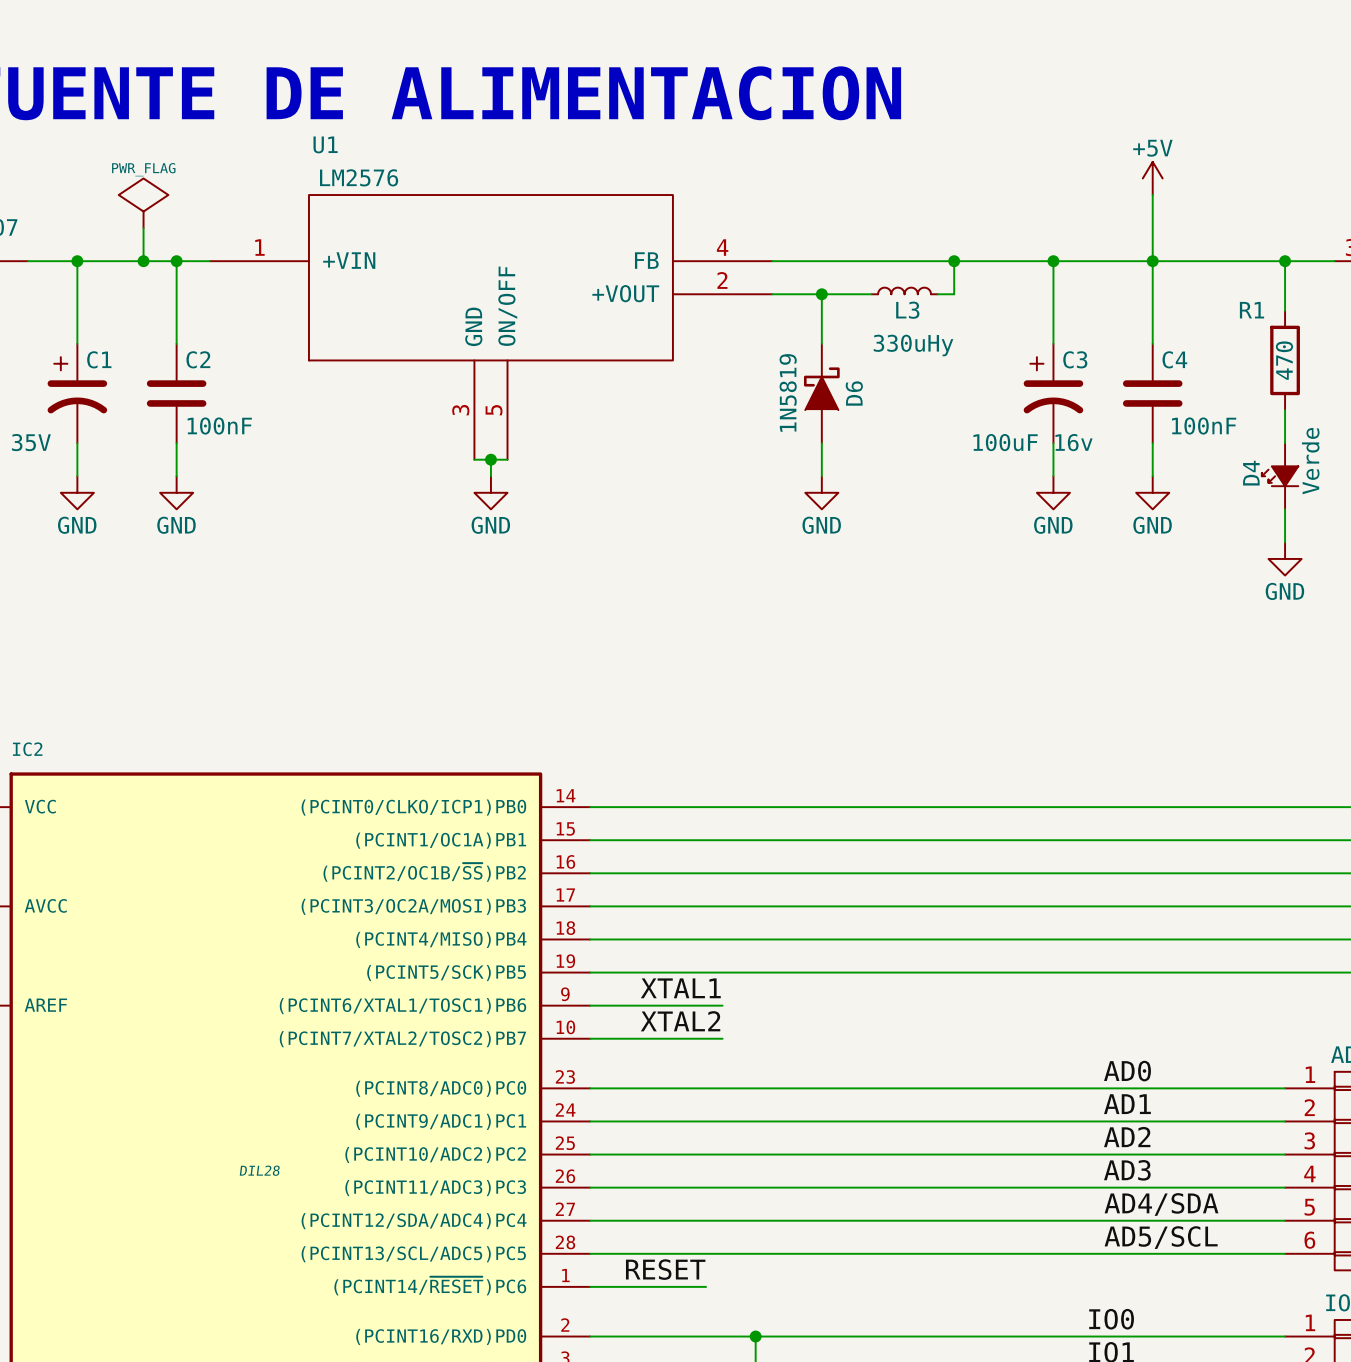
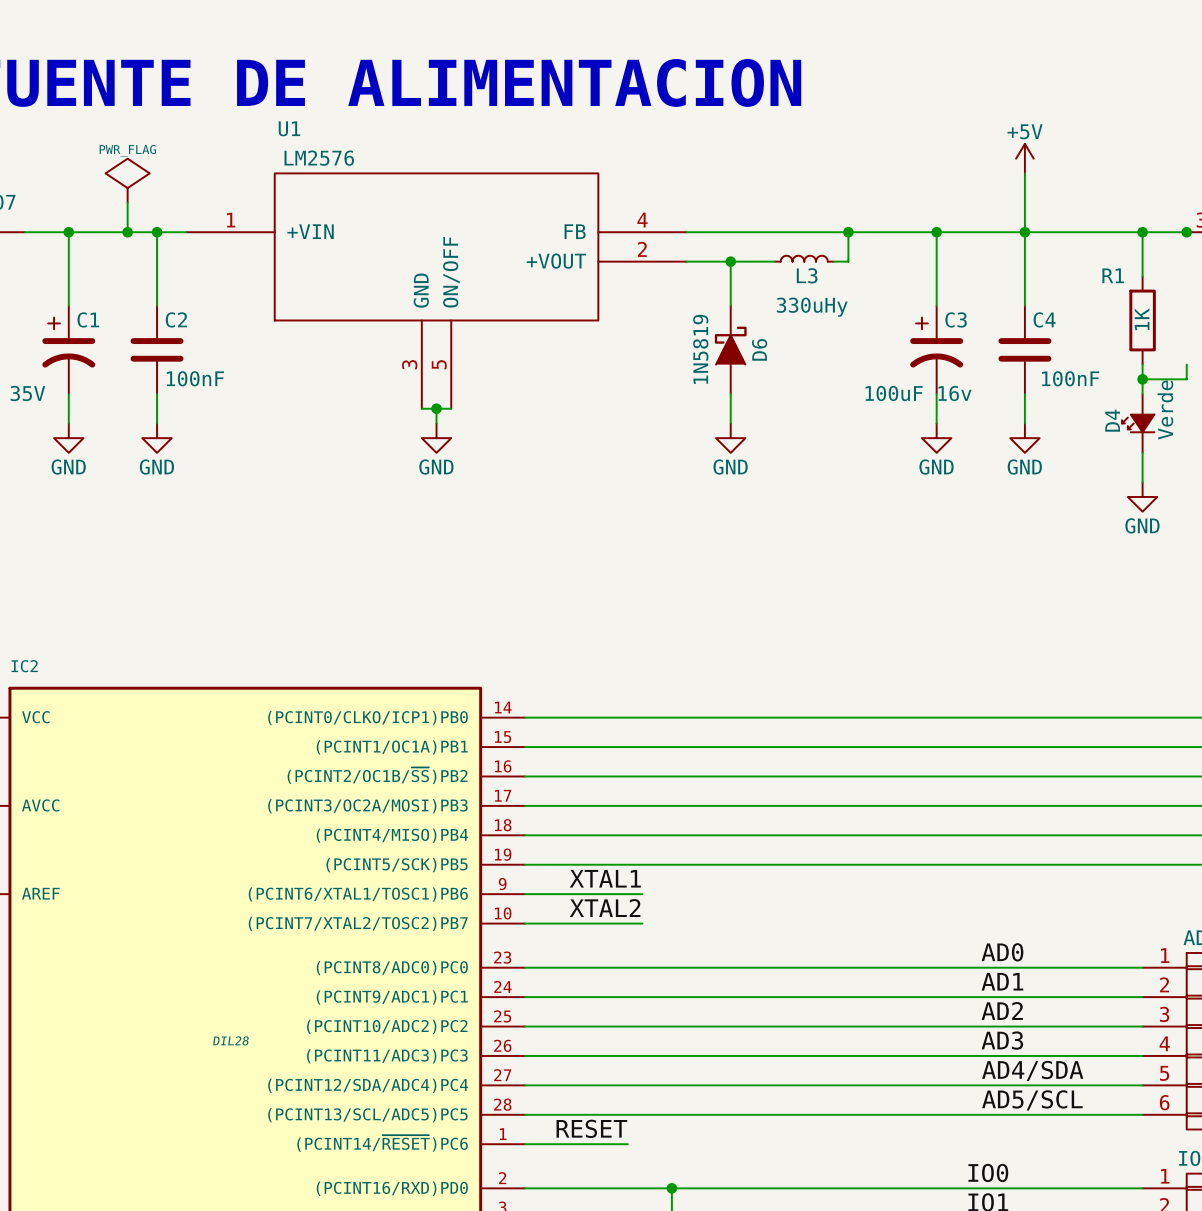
junction: none -> (1186, 232)
R1 value: 470 (1284, 360) -> 1K (1142, 319)
wire: none -> (1186, 364) (1186, 379) (1142, 379)
junction: none -> (1142, 379)

